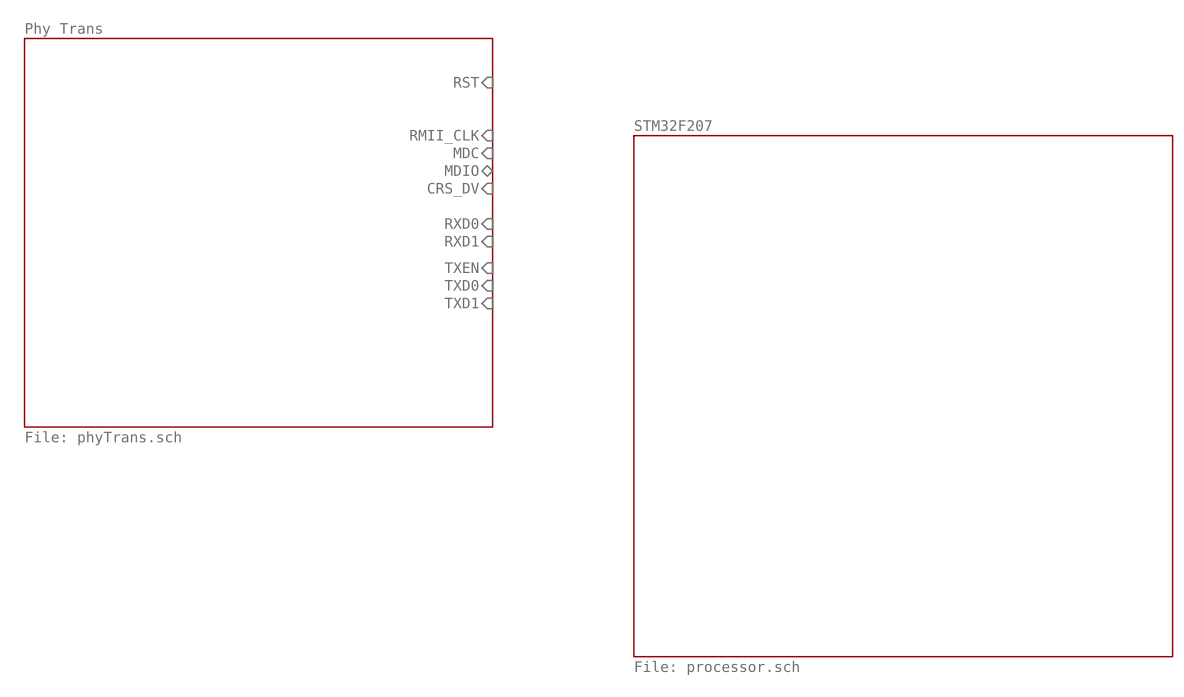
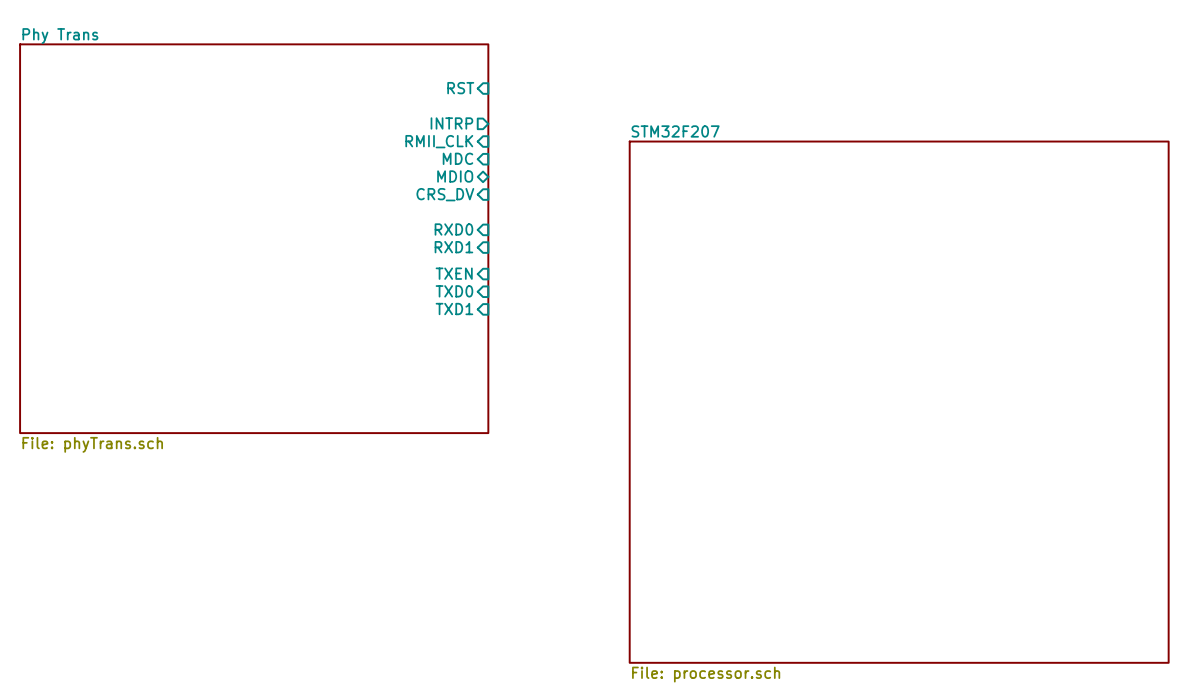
sheet pin: none -> INTRP (451, 123)

